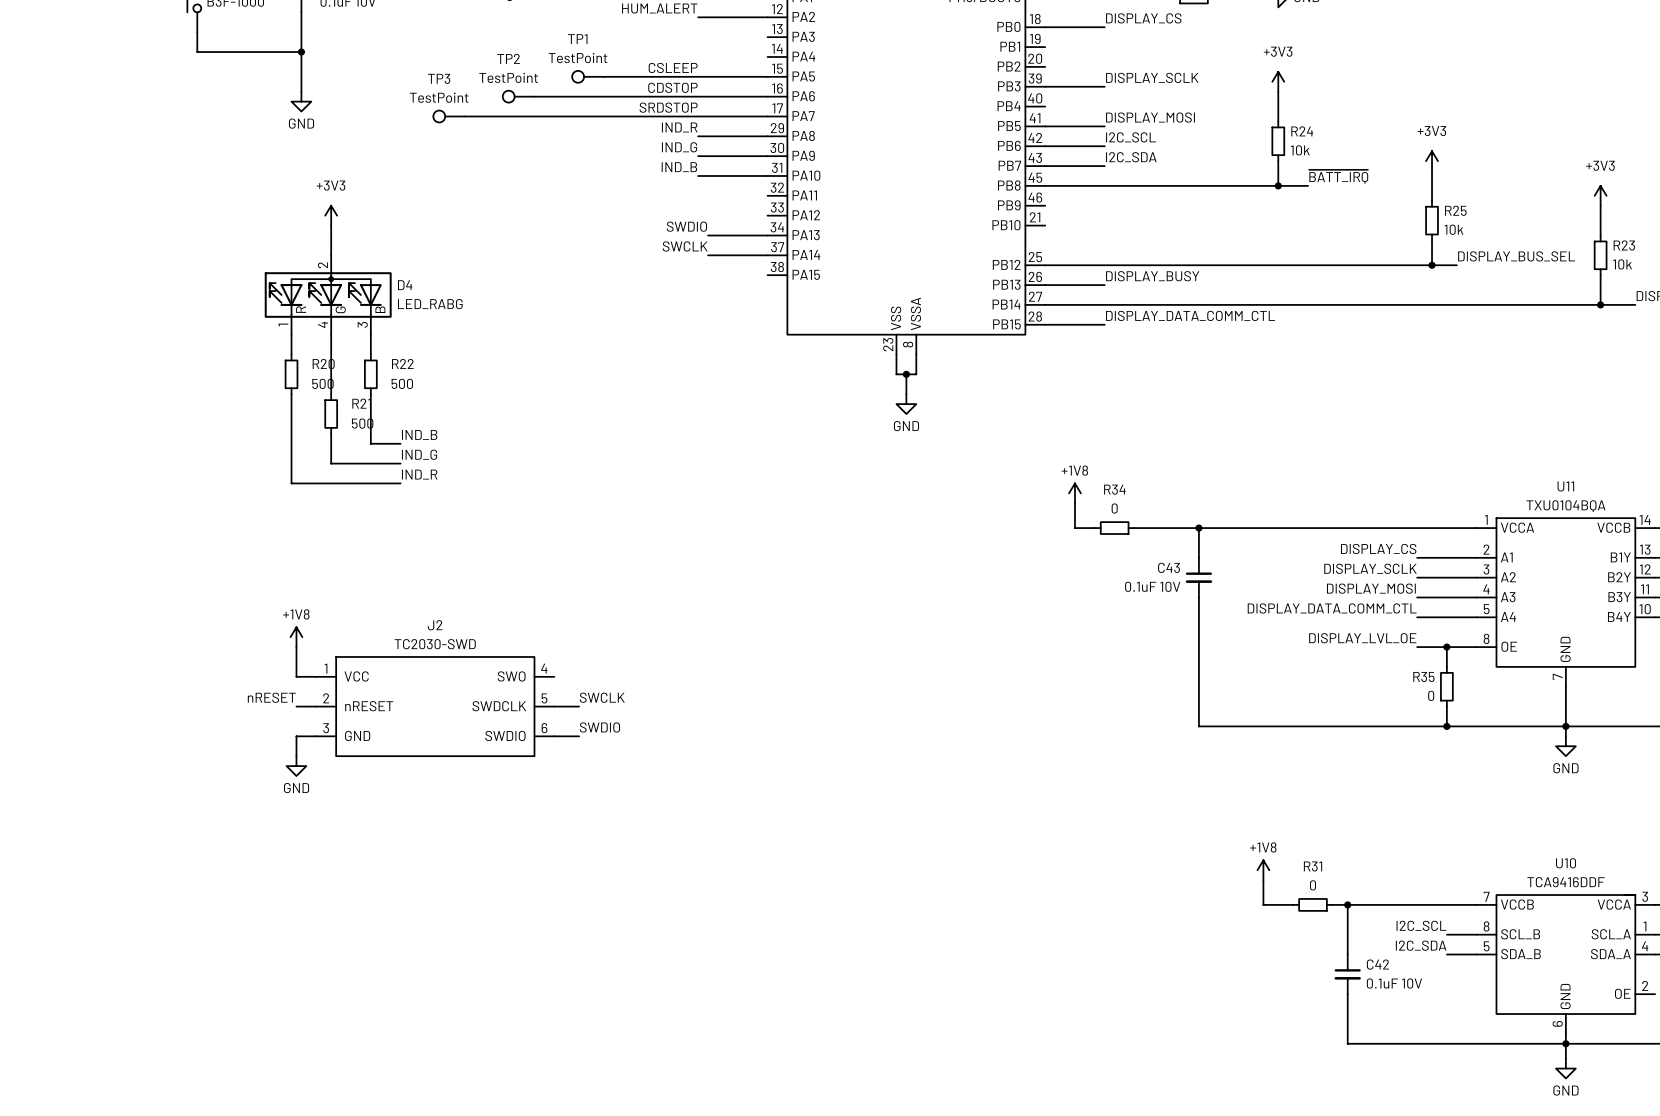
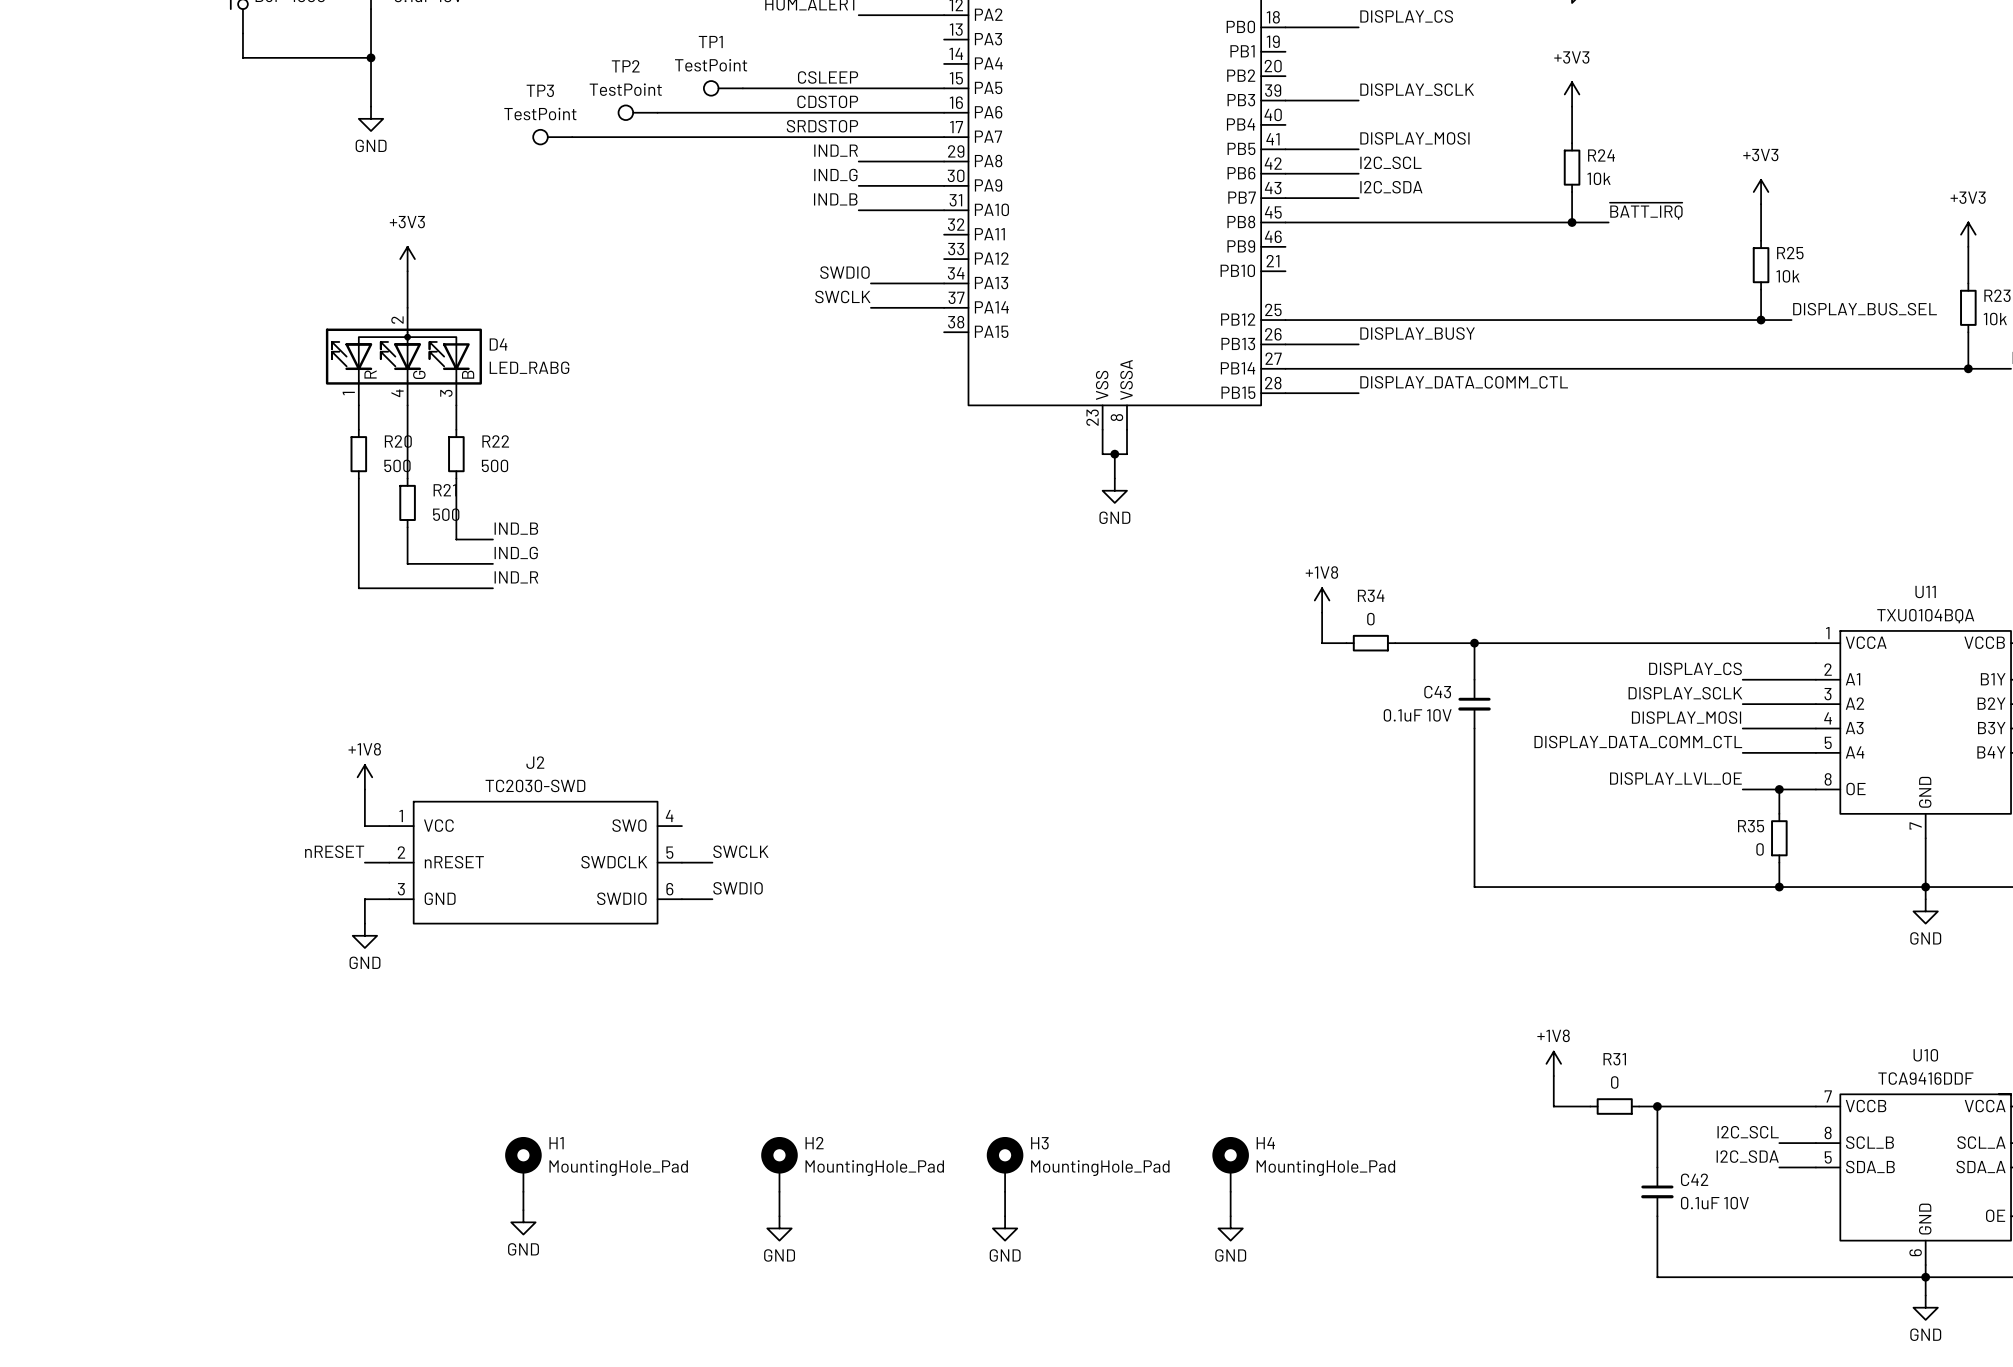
H1: none -> MountingHole_Pad (523, 1164)
H2: none -> MountingHole_Pad (779, 1164)
H3: none -> MountingHole_Pad (1005, 1164)
H4: none -> MountingHole_Pad (1230, 1164)
wire: none -> (523, 1191) (523, 1210)
wire: none -> (779, 1191) (779, 1216)
wire: none -> (1005, 1191) (1005, 1216)
wire: none -> (1230, 1191) (1230, 1216)
power symbol: none -> GND (523, 1222)
power symbol: none -> GND (779, 1228)
power symbol: none -> GND (1005, 1228)
power symbol: none -> GND (1230, 1228)

